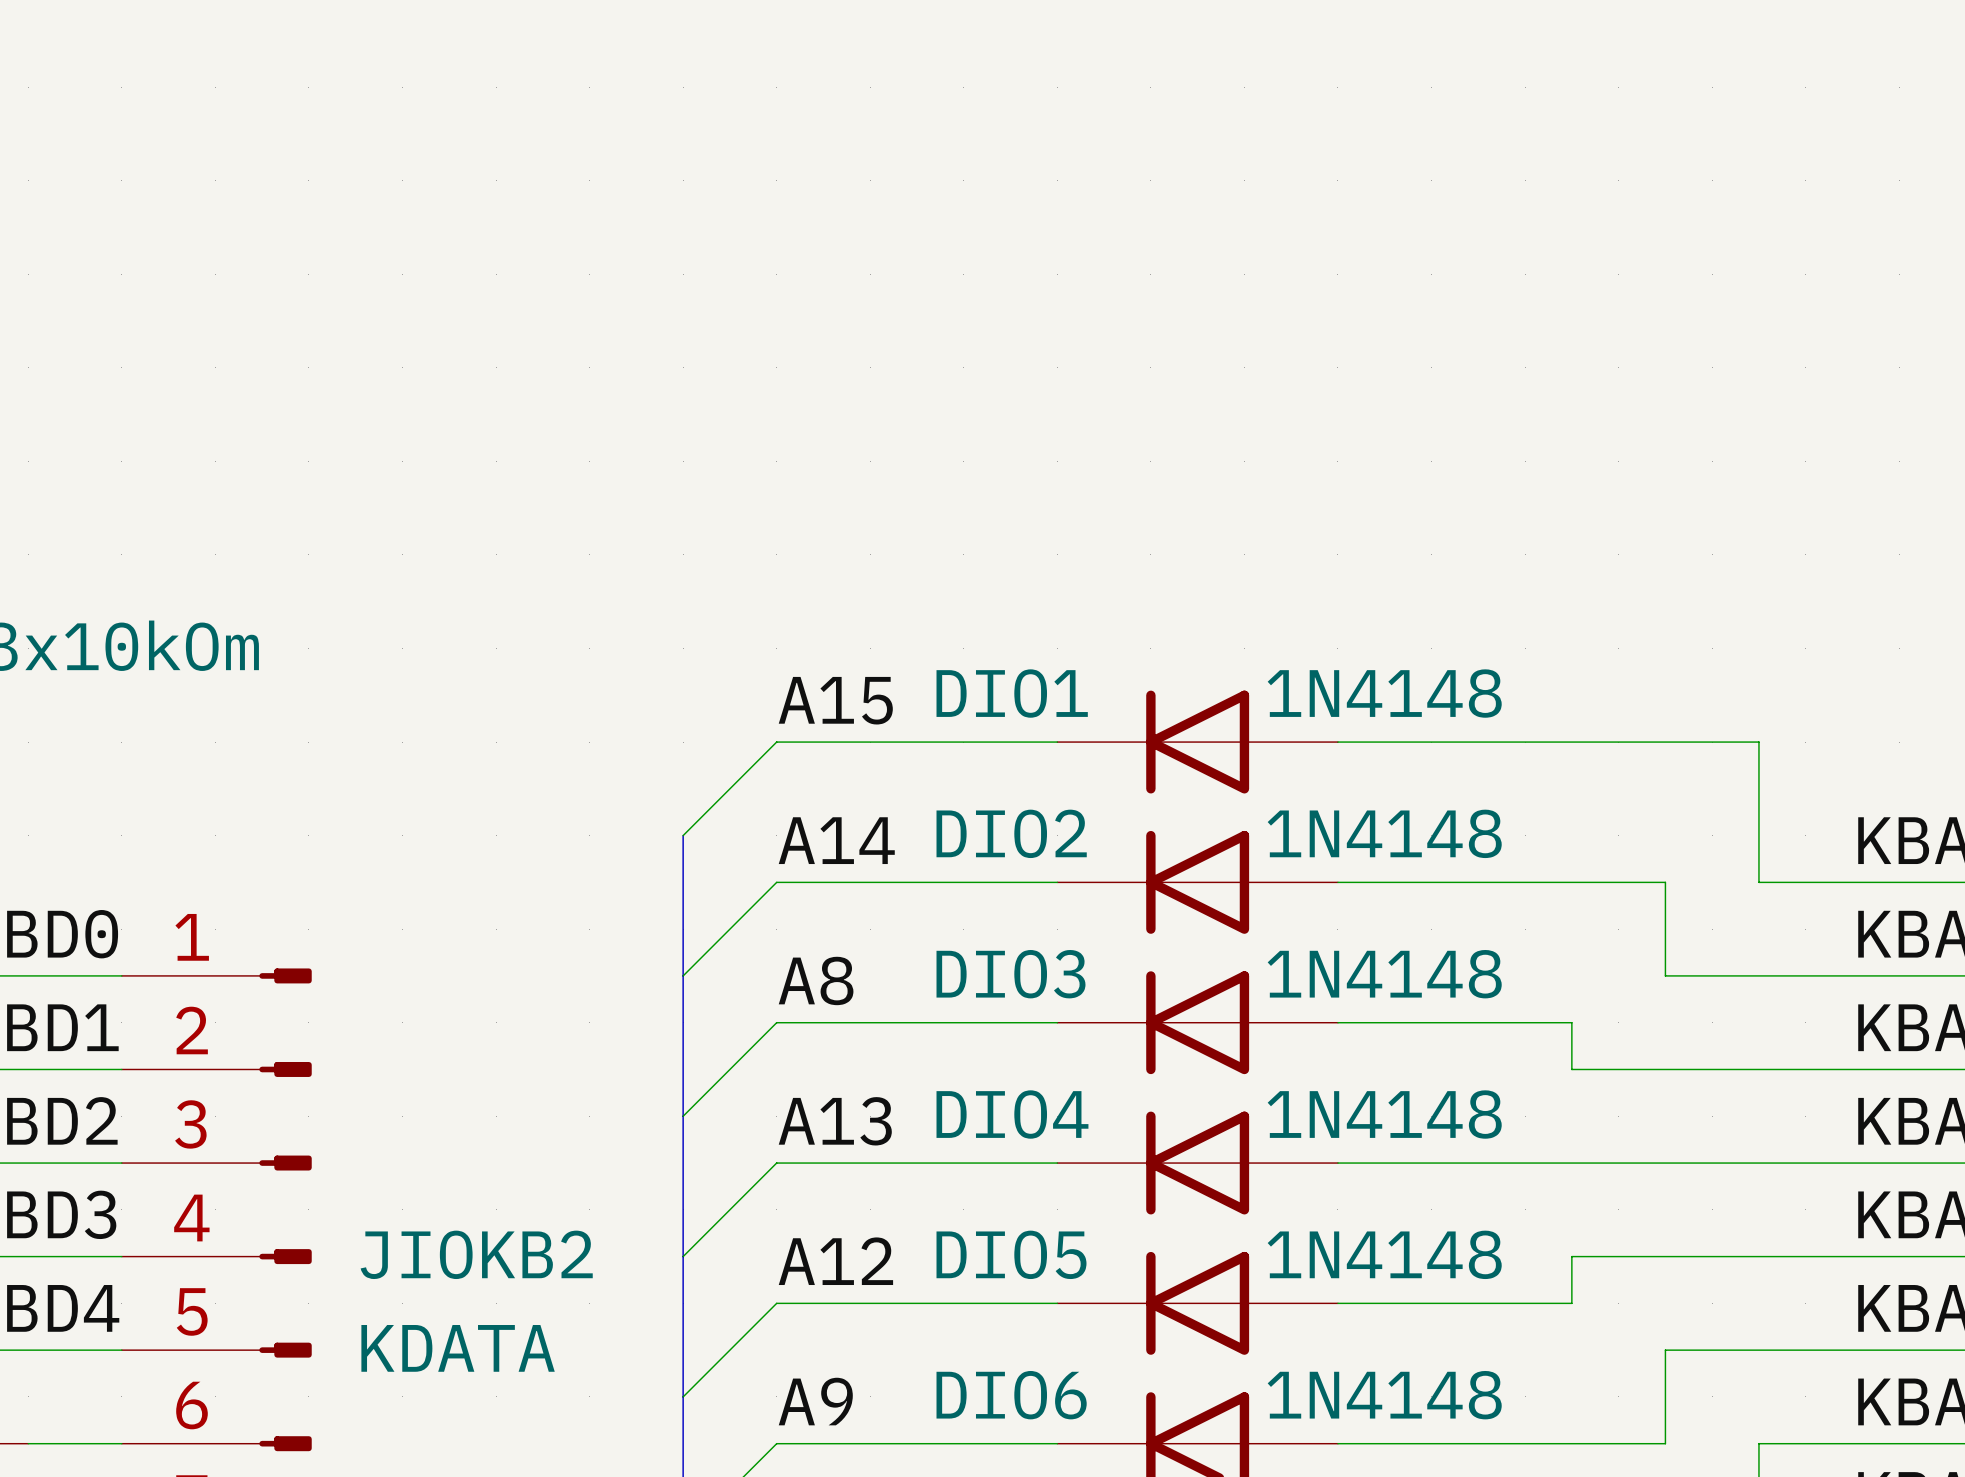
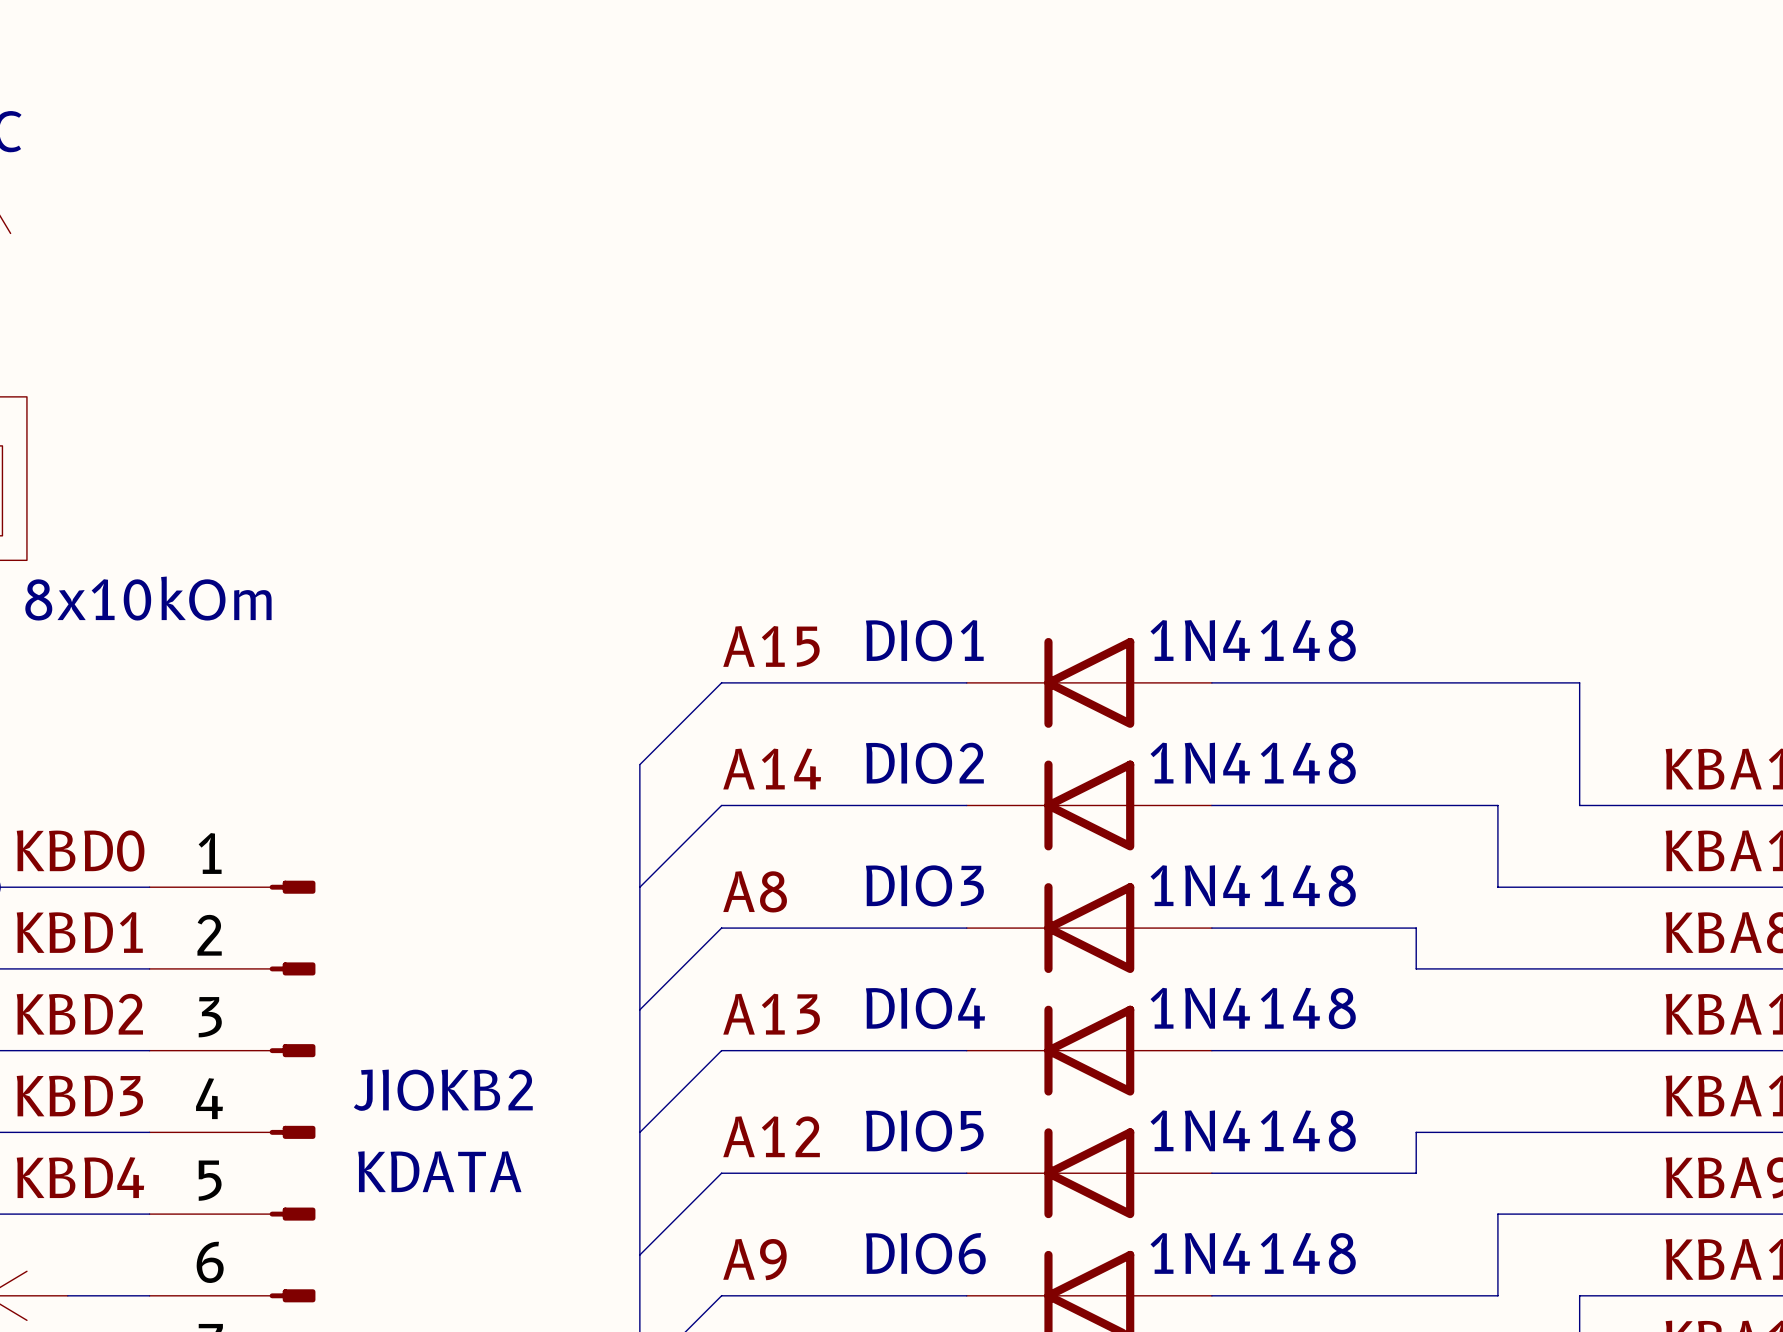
JIOKB2 name position: JIOKB2 (476, 1254) -> JIOKB2 (443, 1090)
JIOKB2 value position: KDATA (458, 1348) -> KDATA (439, 1171)

